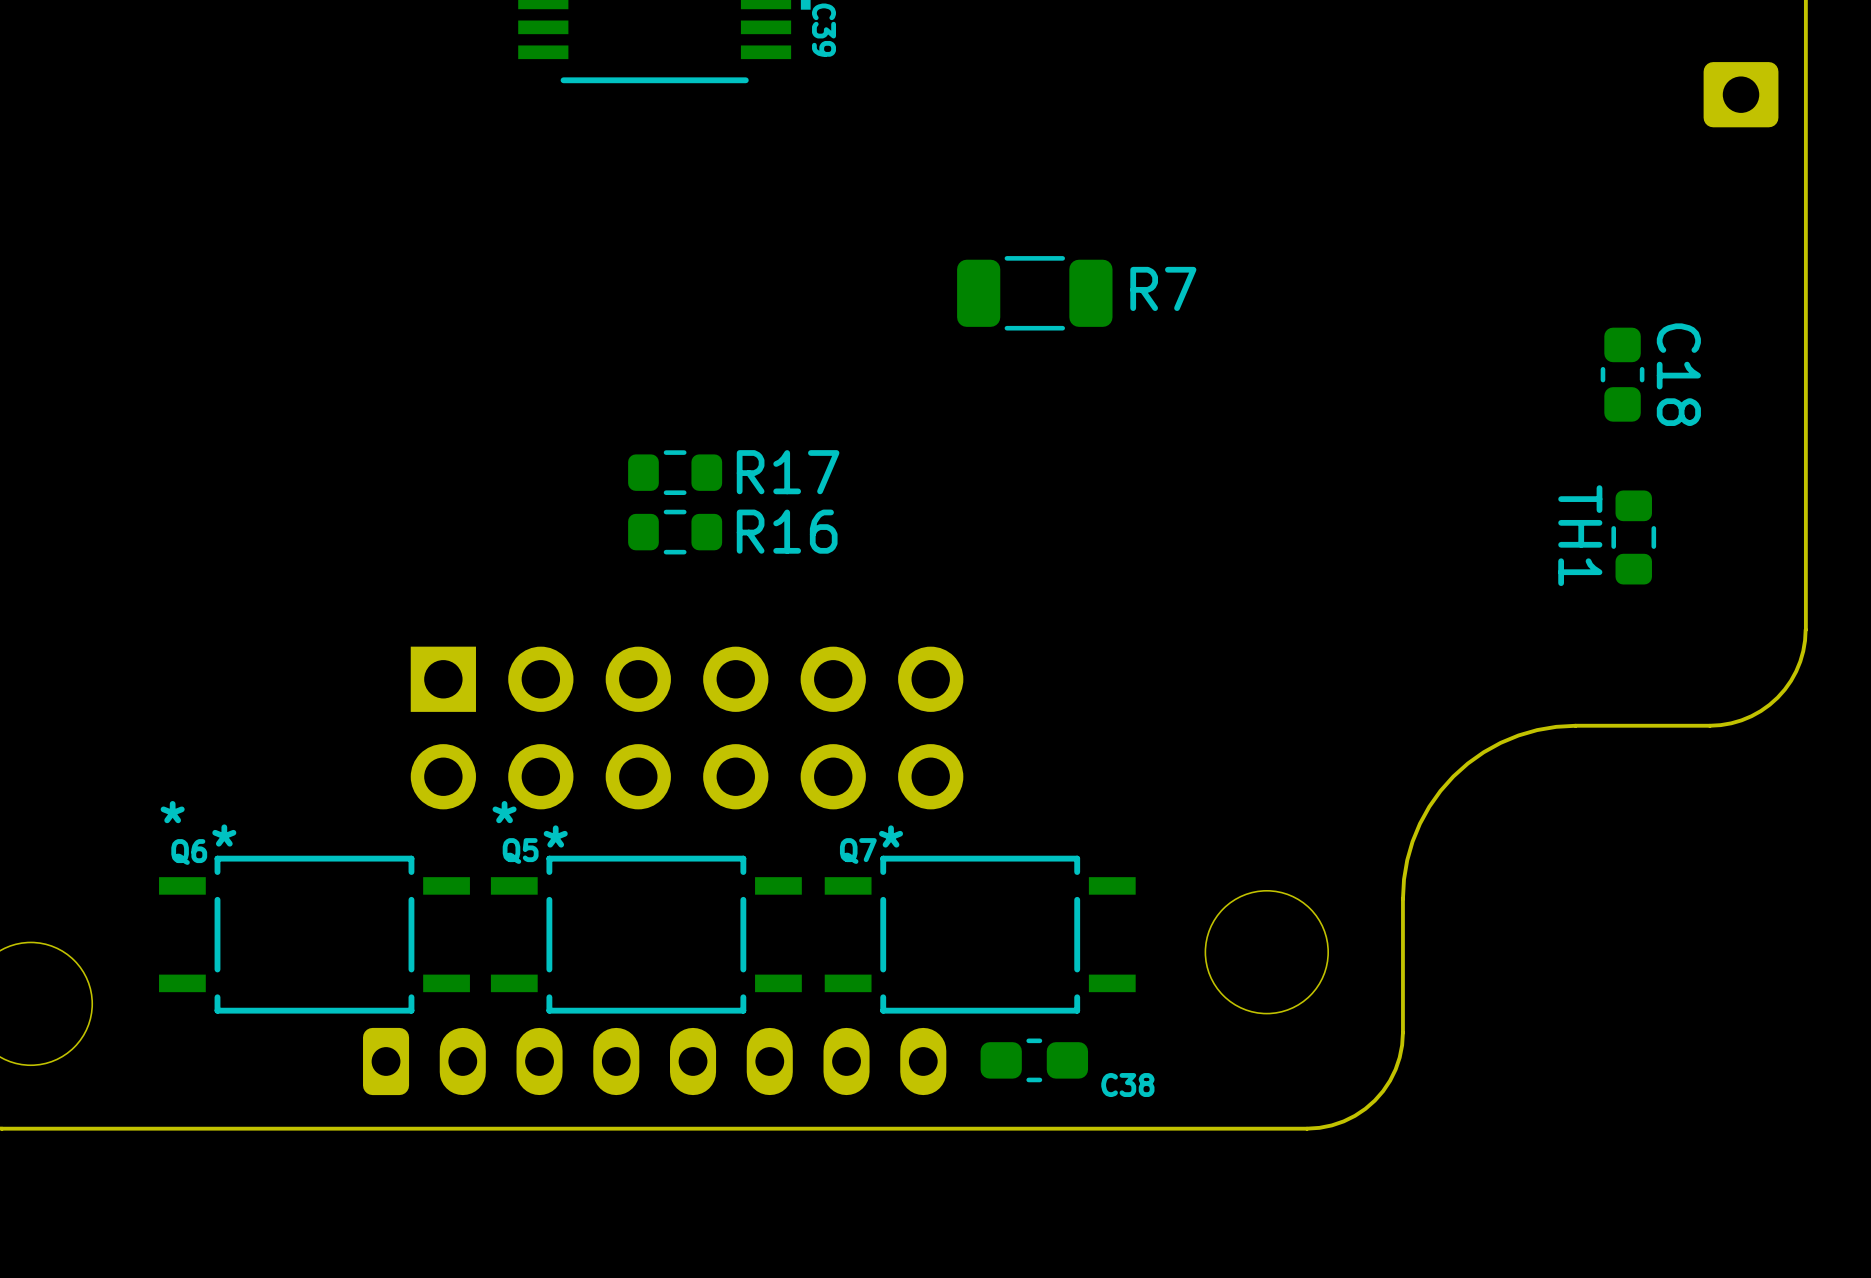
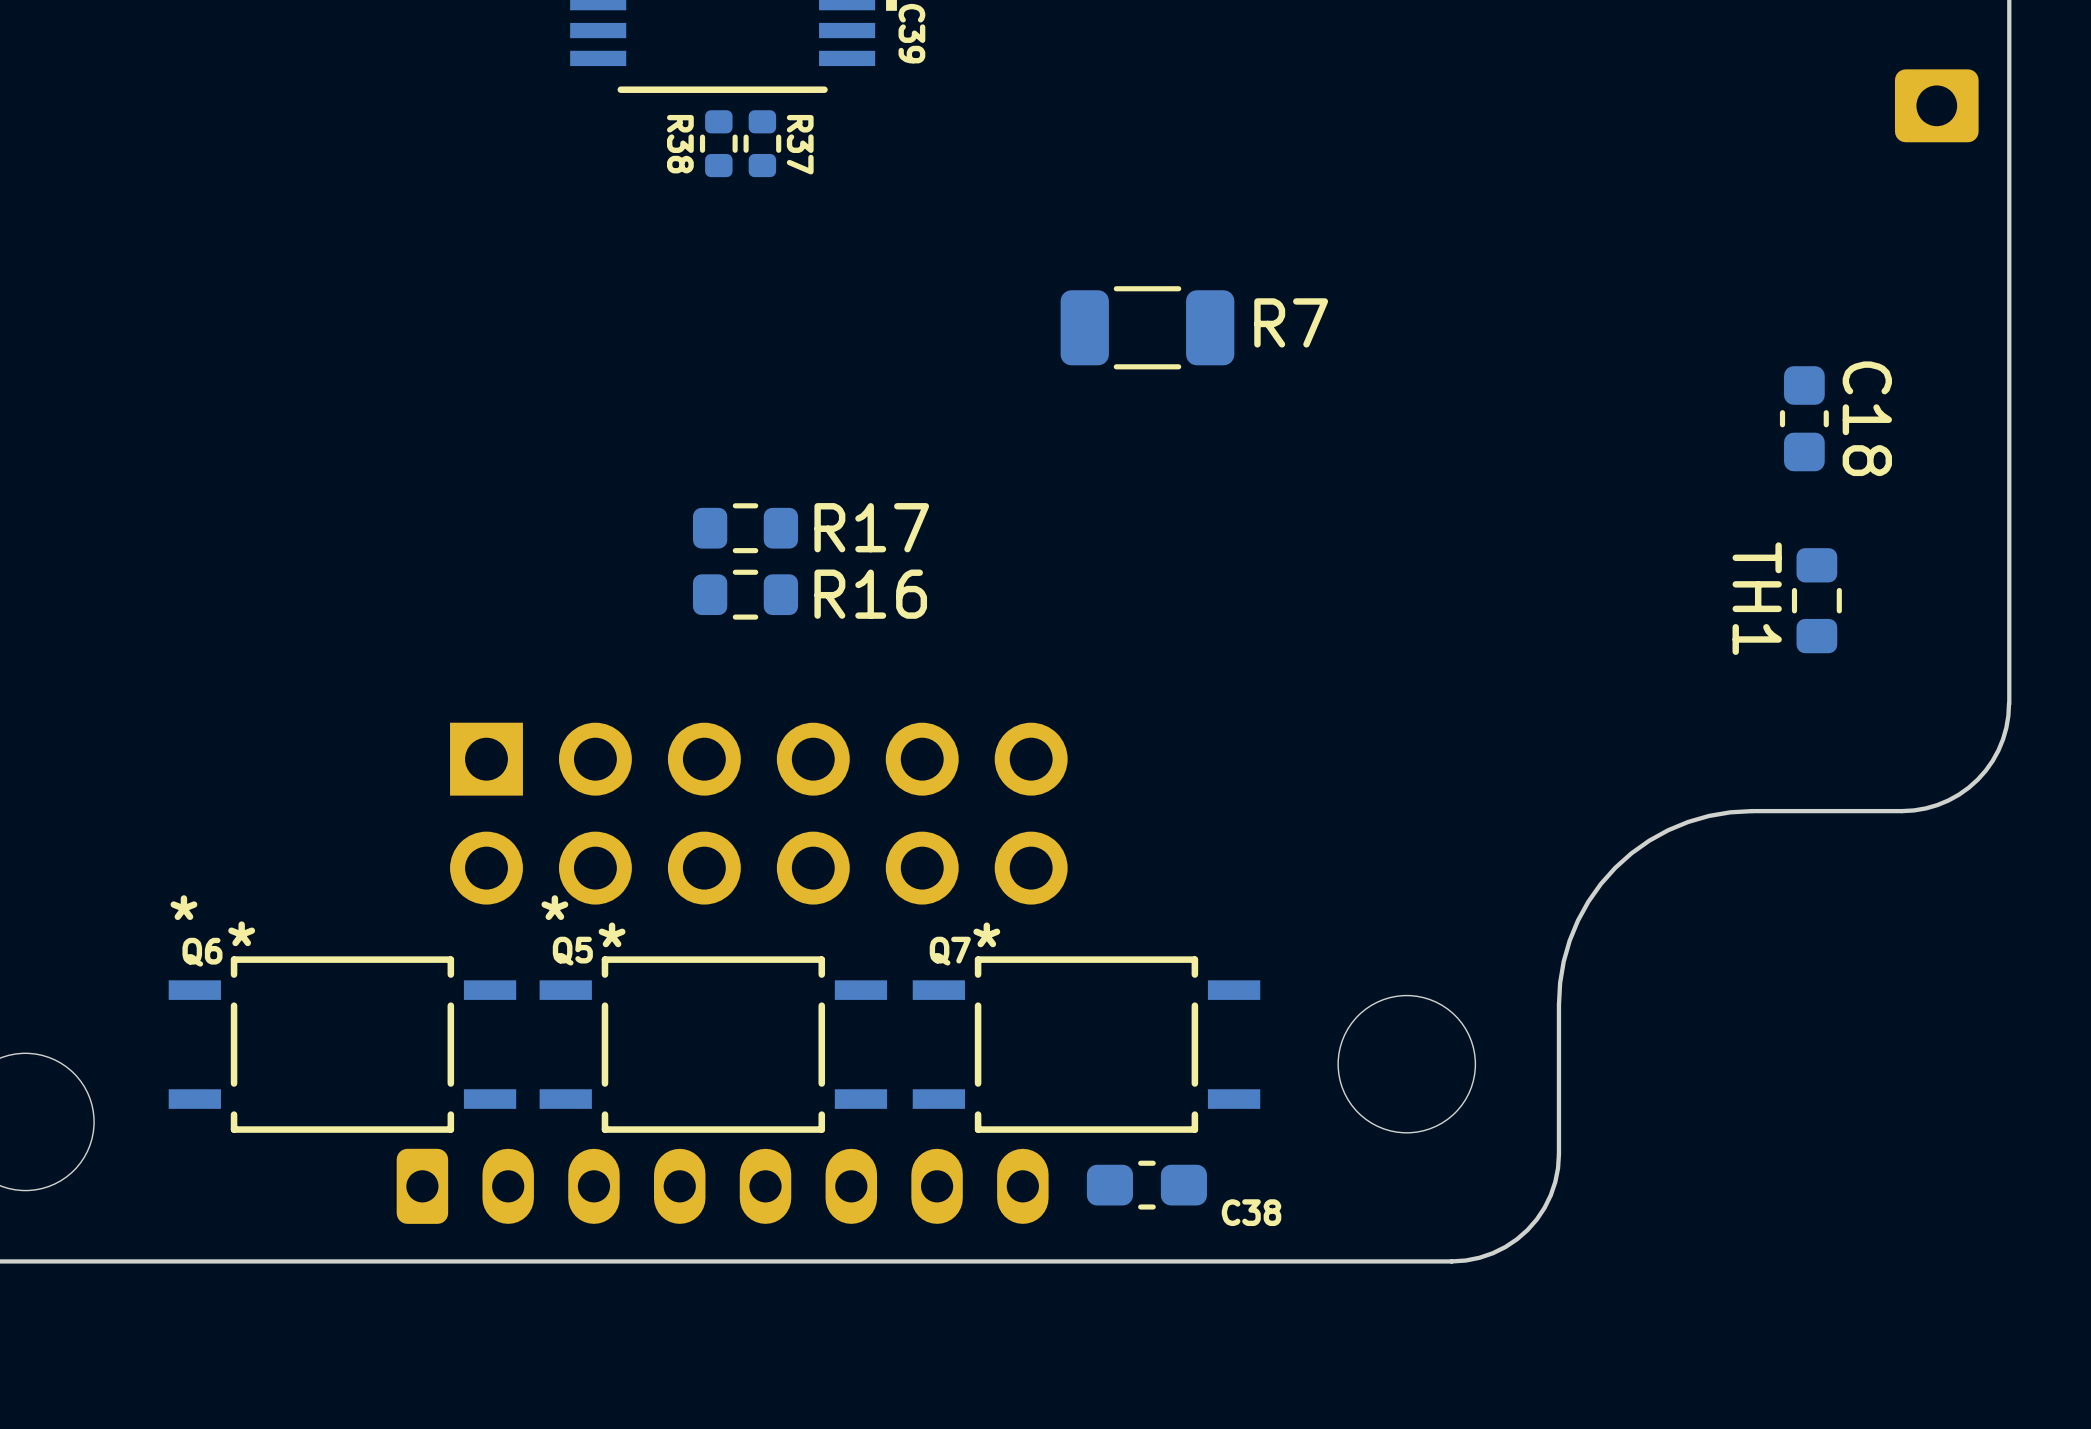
R38: none -> (718, 143)
R37: none -> (762, 143)

